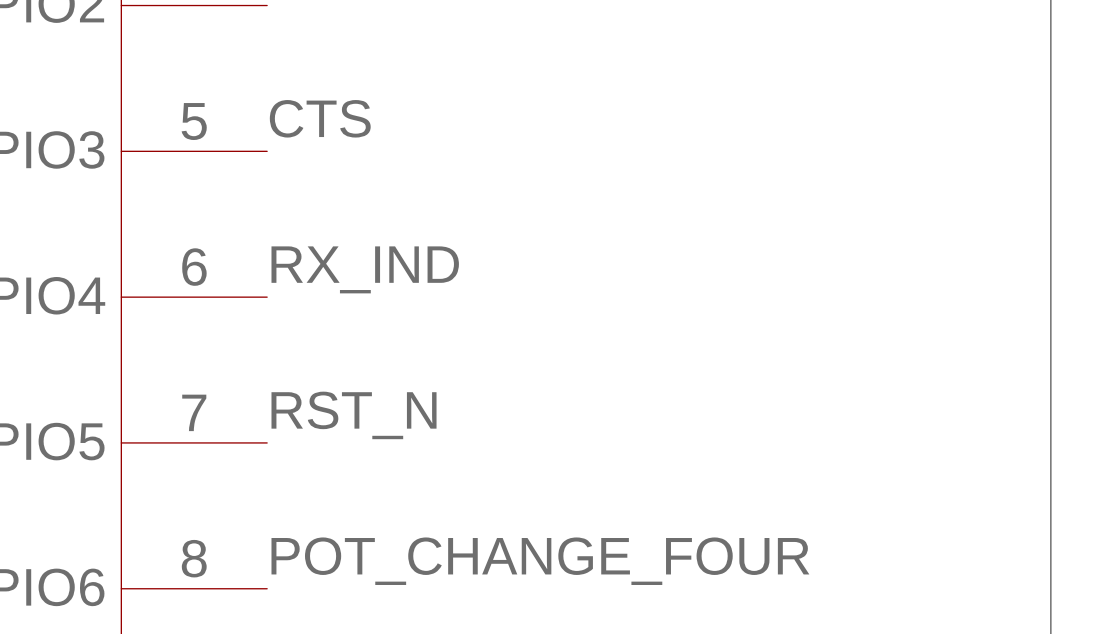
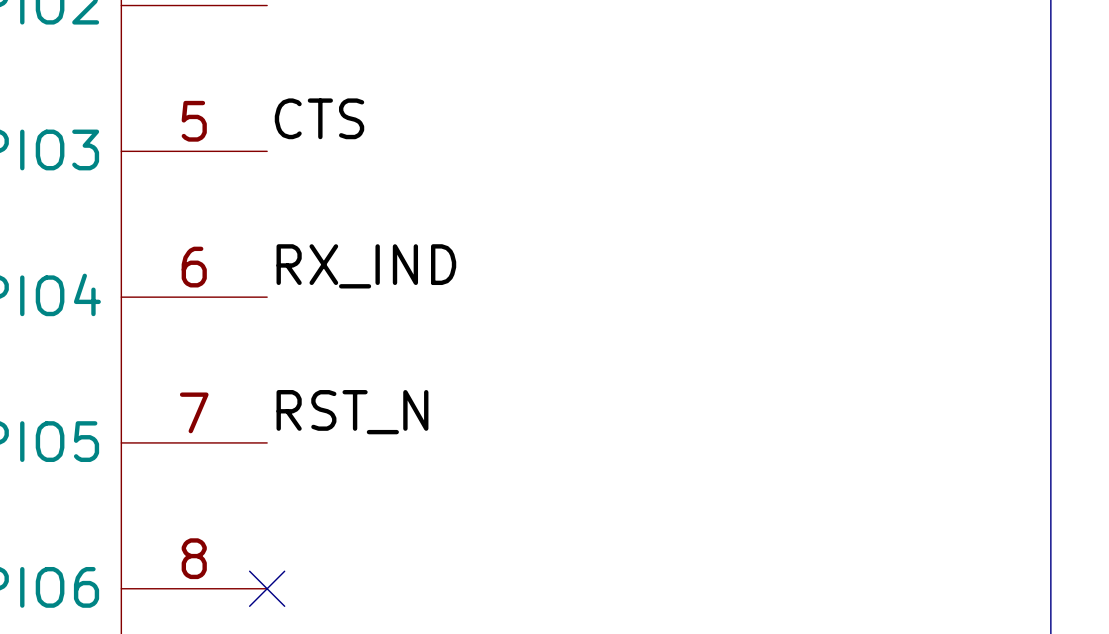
label: POT_CHANGE_FOUR (540, 561) -> none
no-connect mark: none -> (267, 588)

